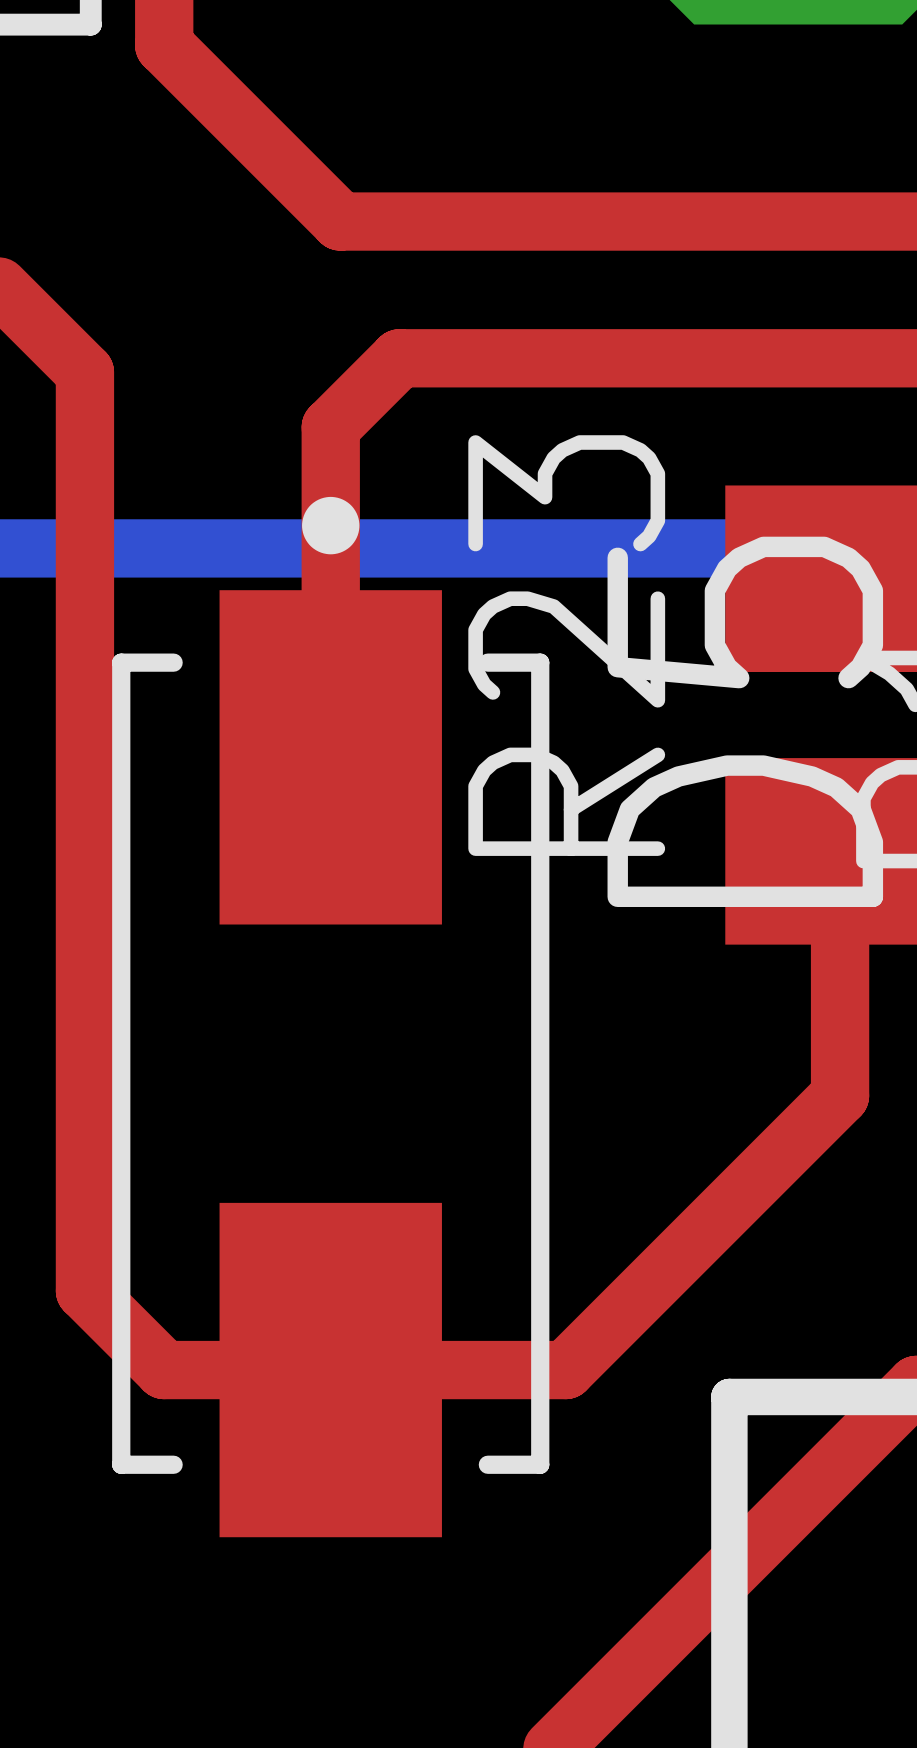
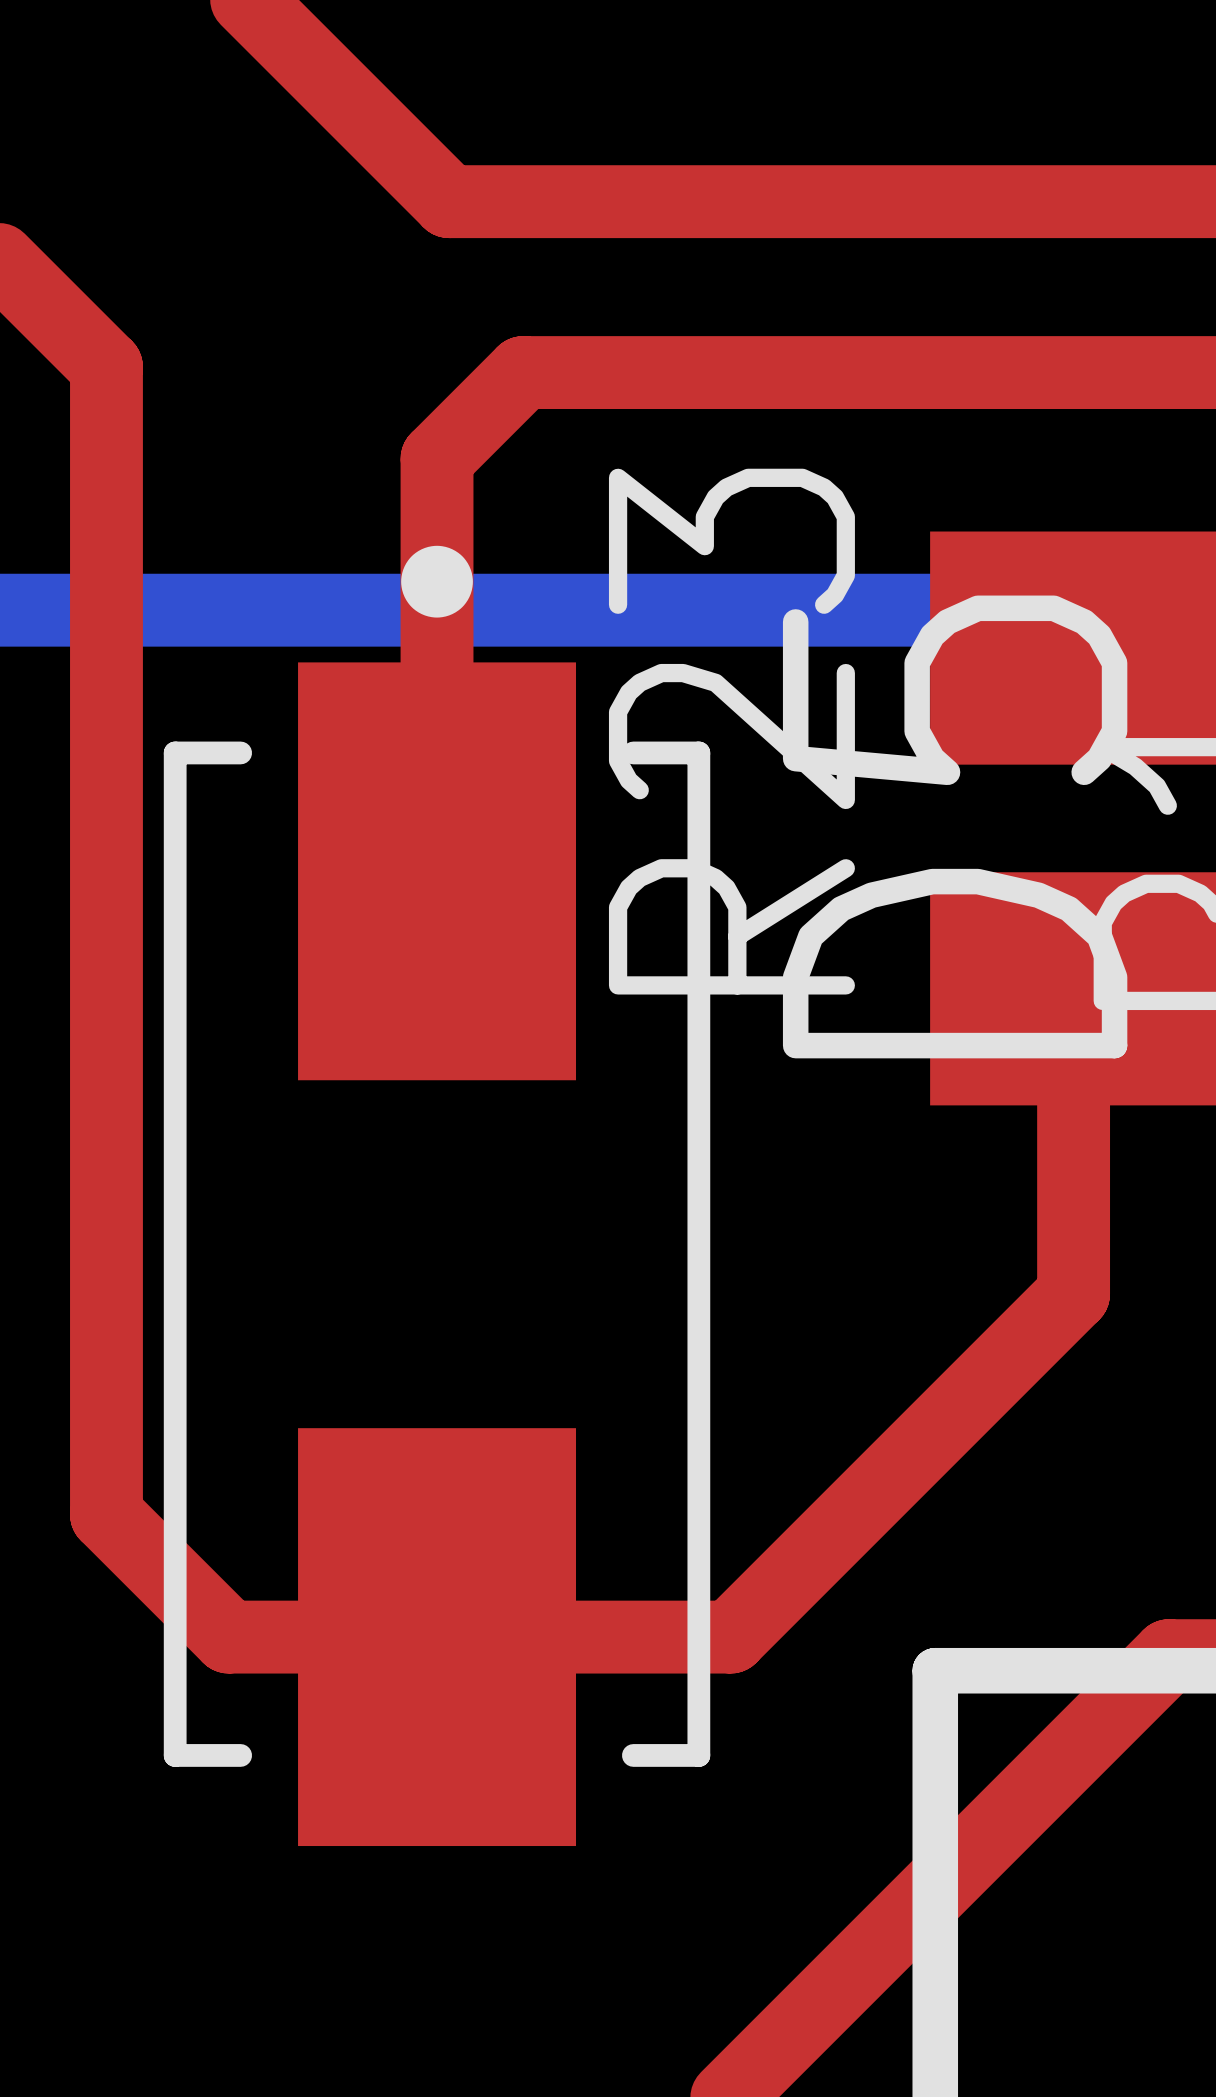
top track: (66, 353) (84, 372) (84, 1290) -> (106, 366) (106, 1514) (129, 1538)

